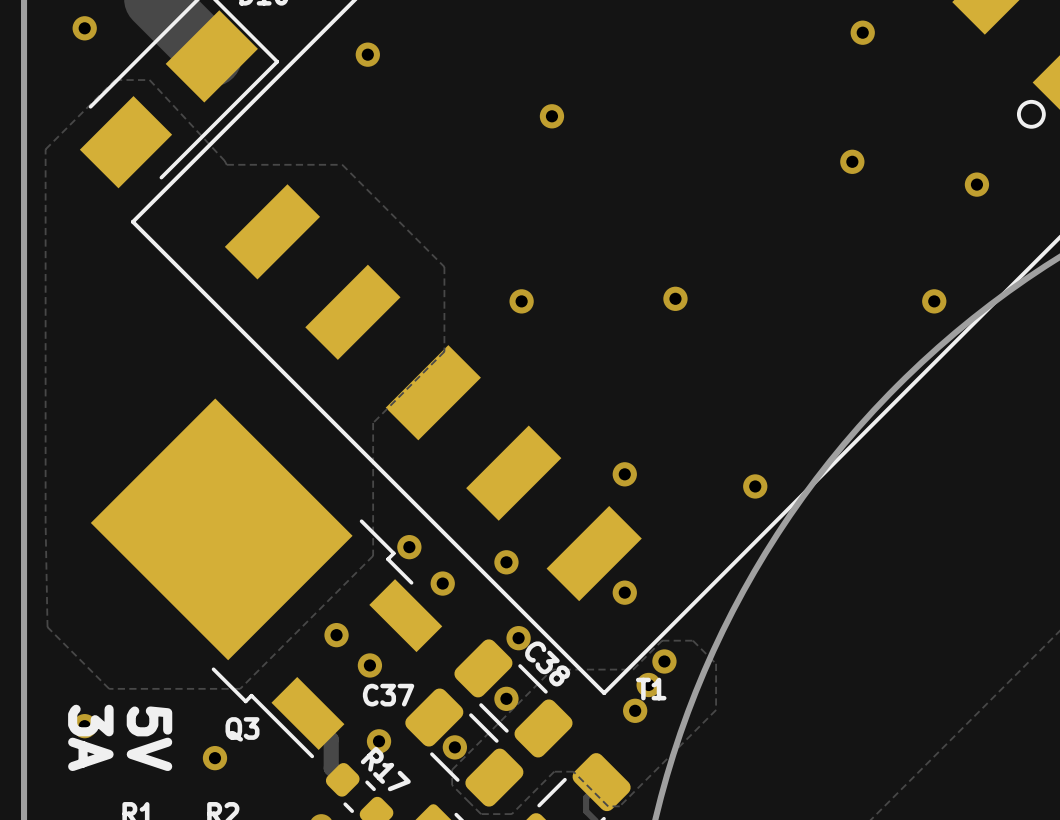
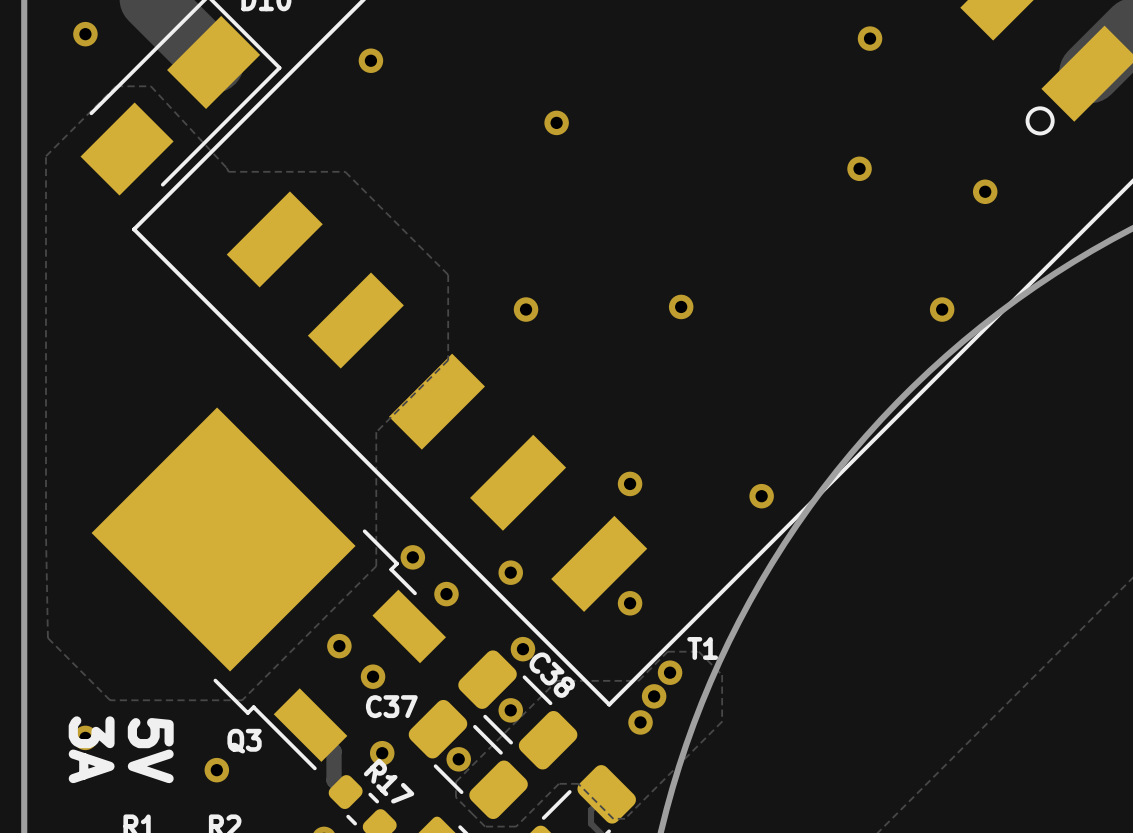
T1 name position: T1 (651, 689) -> T1 (702, 648)

